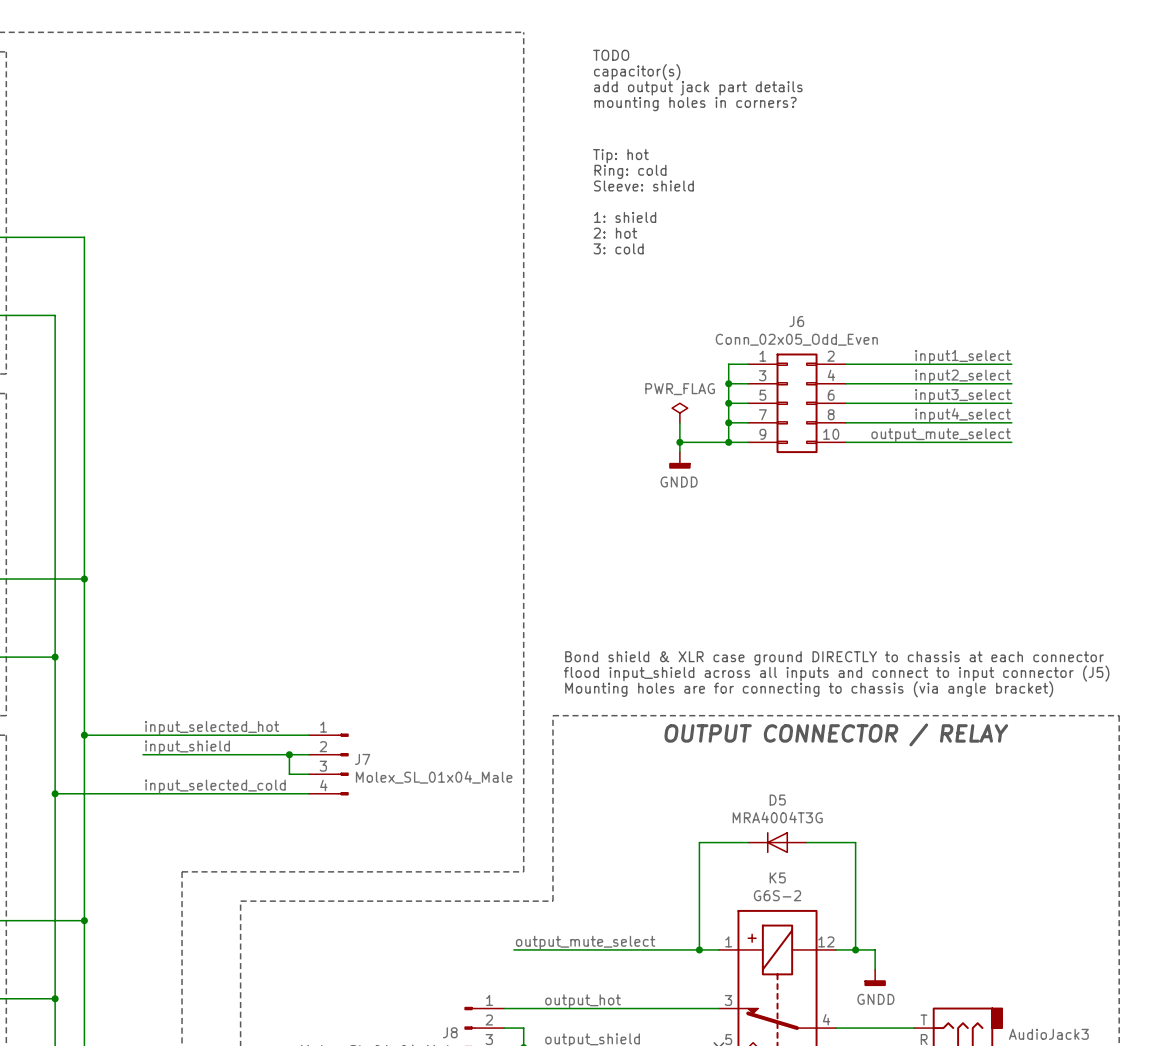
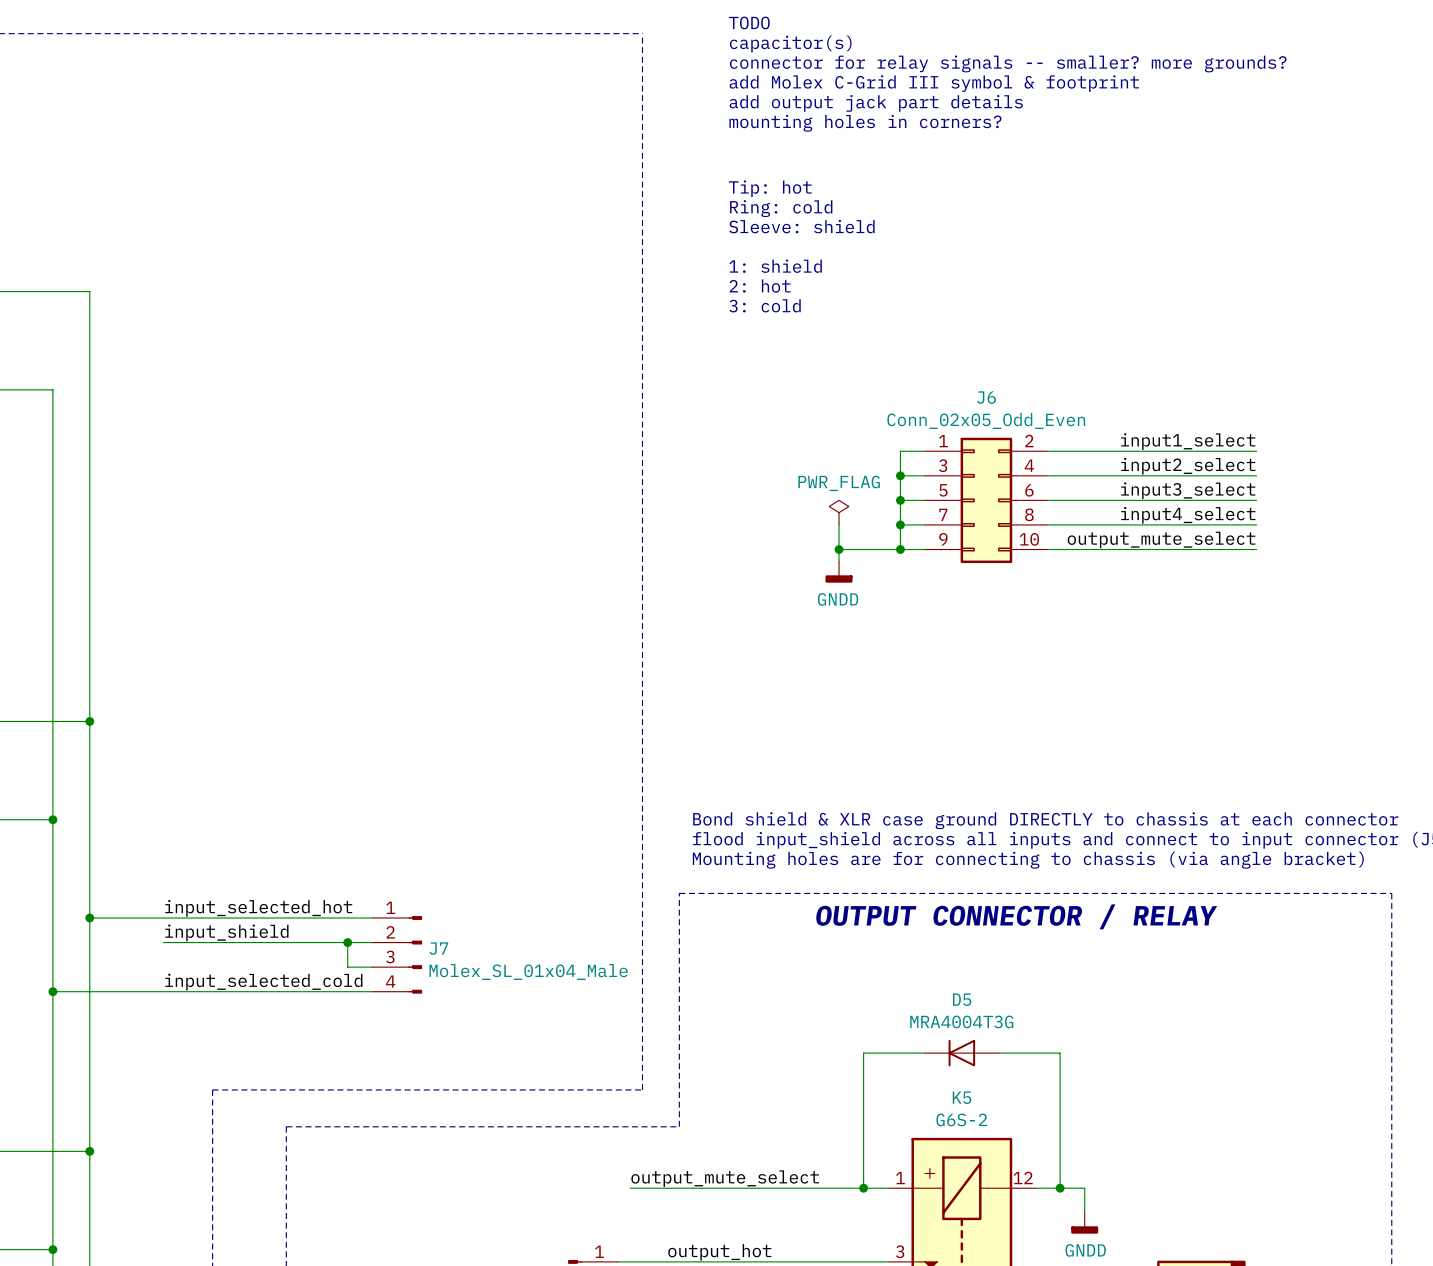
text: none -> TODO (749, 22)
text: none -> capacitor(s) (790, 43)
text: TODO (611, 55) -> connector for relay signals -- smaller? more grounds? (1008, 63)
text: capacitor(s) (637, 72) -> add Molex C-Grid III symbol & footprint (934, 83)

